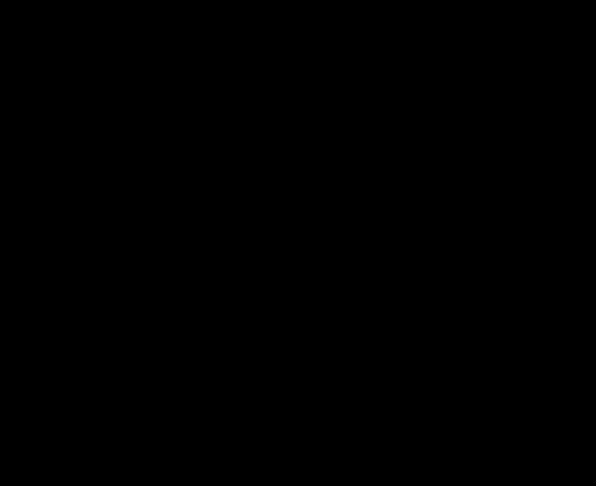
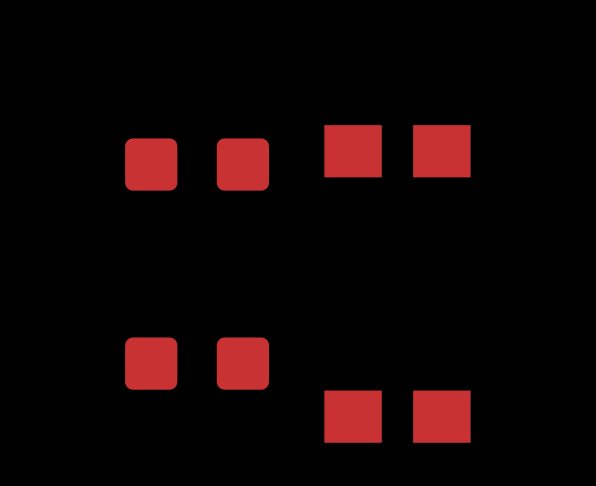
part: none -> (397, 151)
part: none -> (197, 164)
part: none -> (197, 363)
part: none -> (397, 416)

